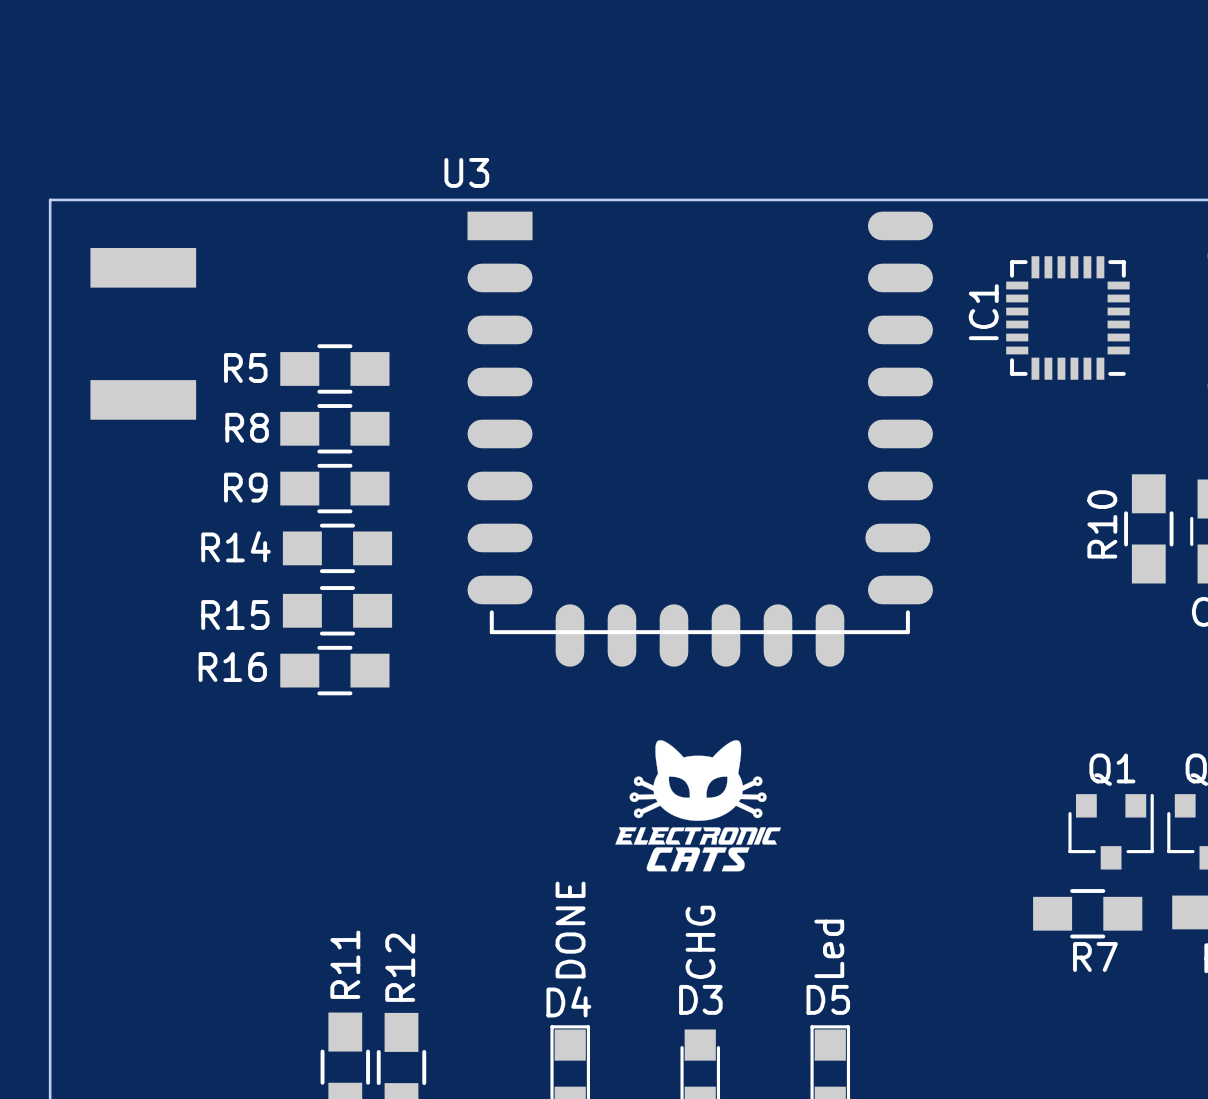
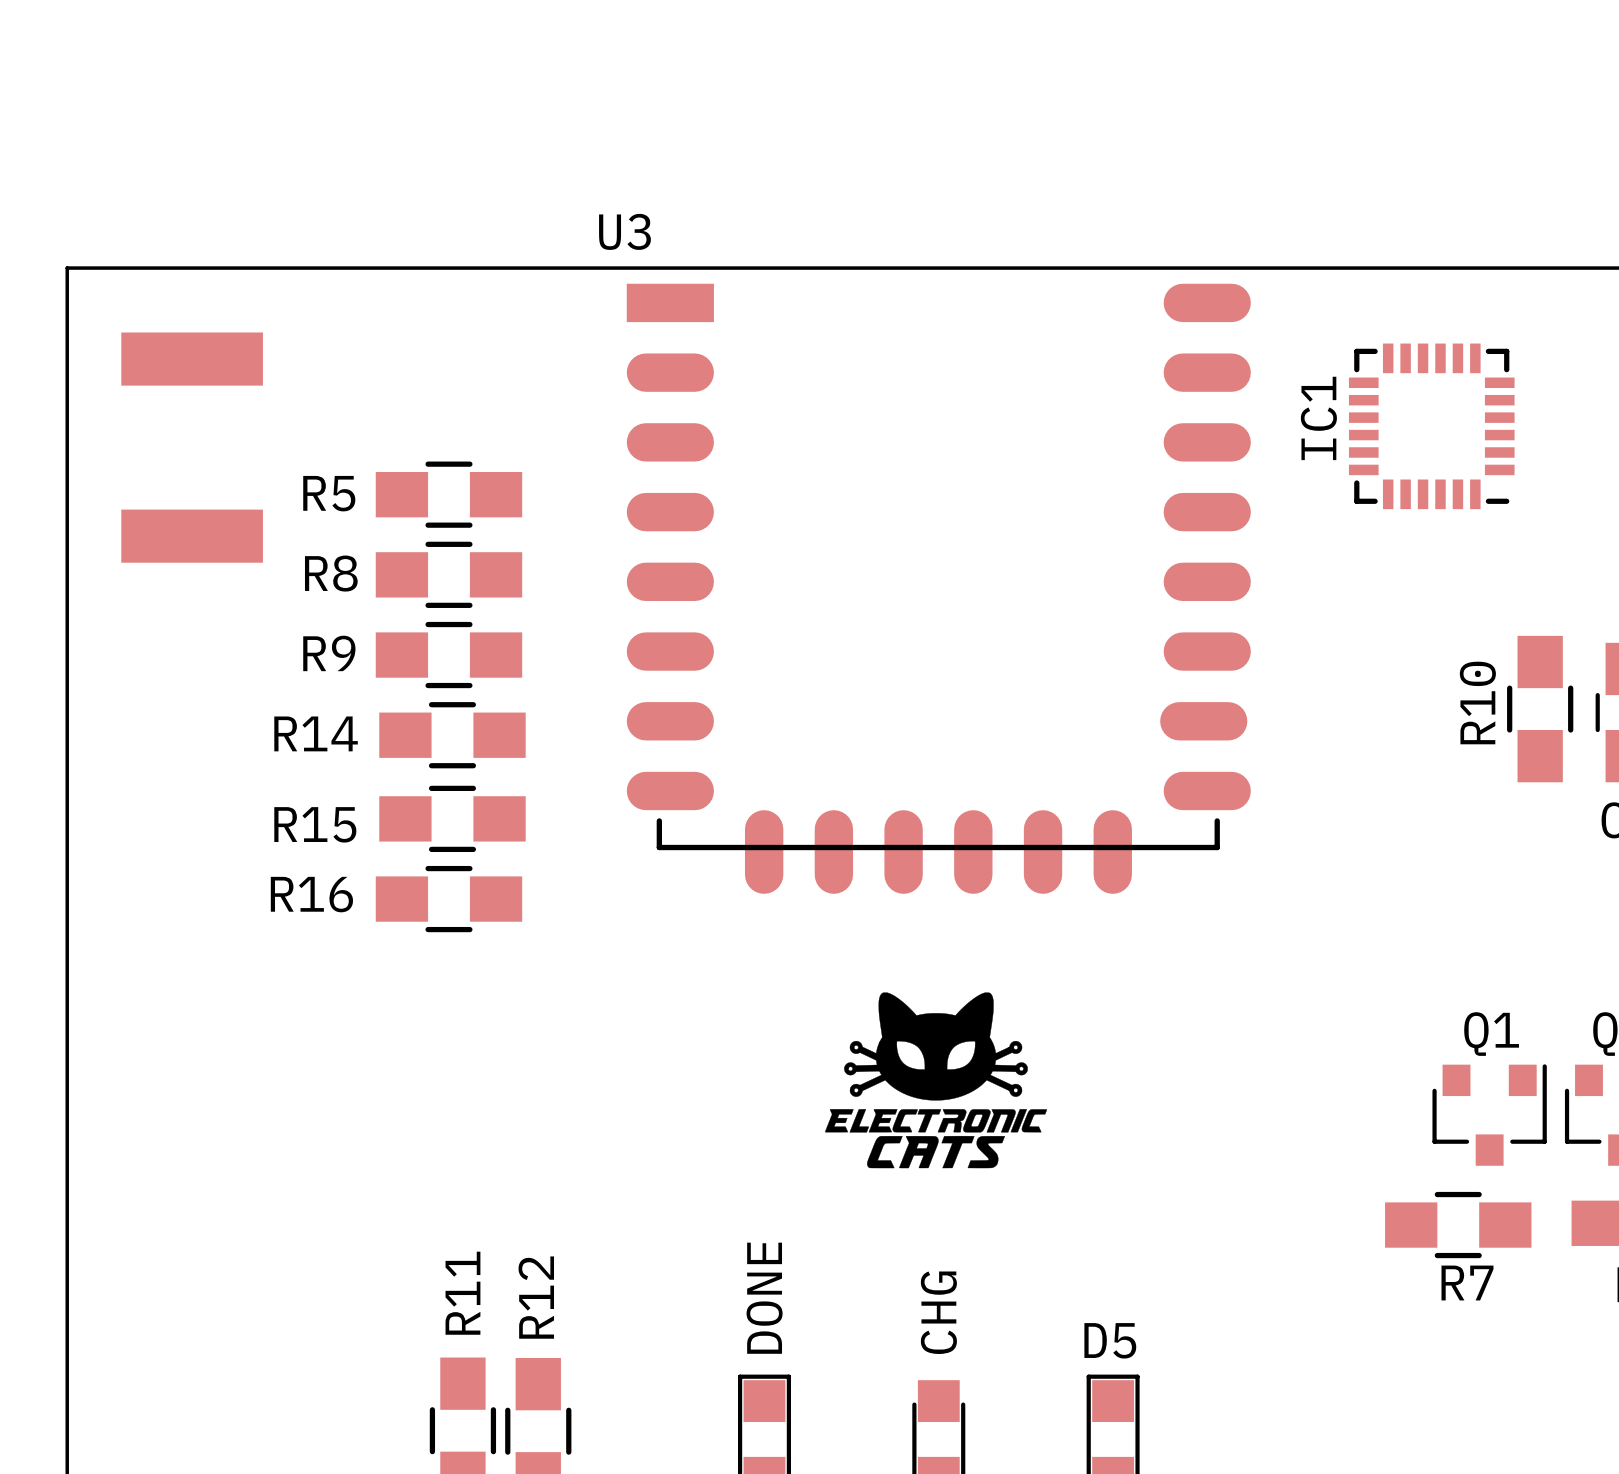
D4 value position: DONE (570, 930) -> DONE (764, 1298)
D3 value position: CHG (700, 942) -> CHG (938, 1312)
D5 value: Led (829, 948) -> none
D3 name: D3 (700, 999) -> none
D4 name: D4 (568, 1001) -> none

